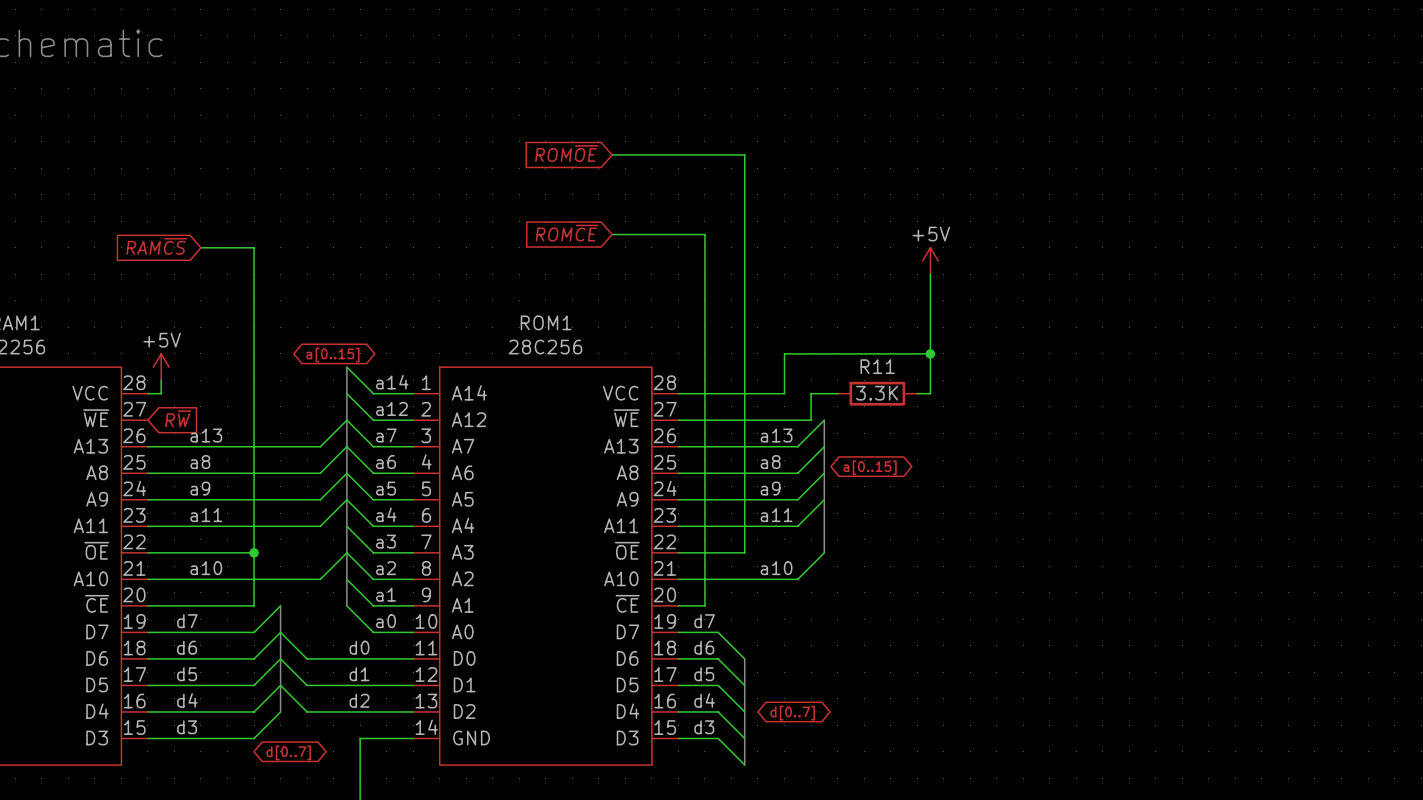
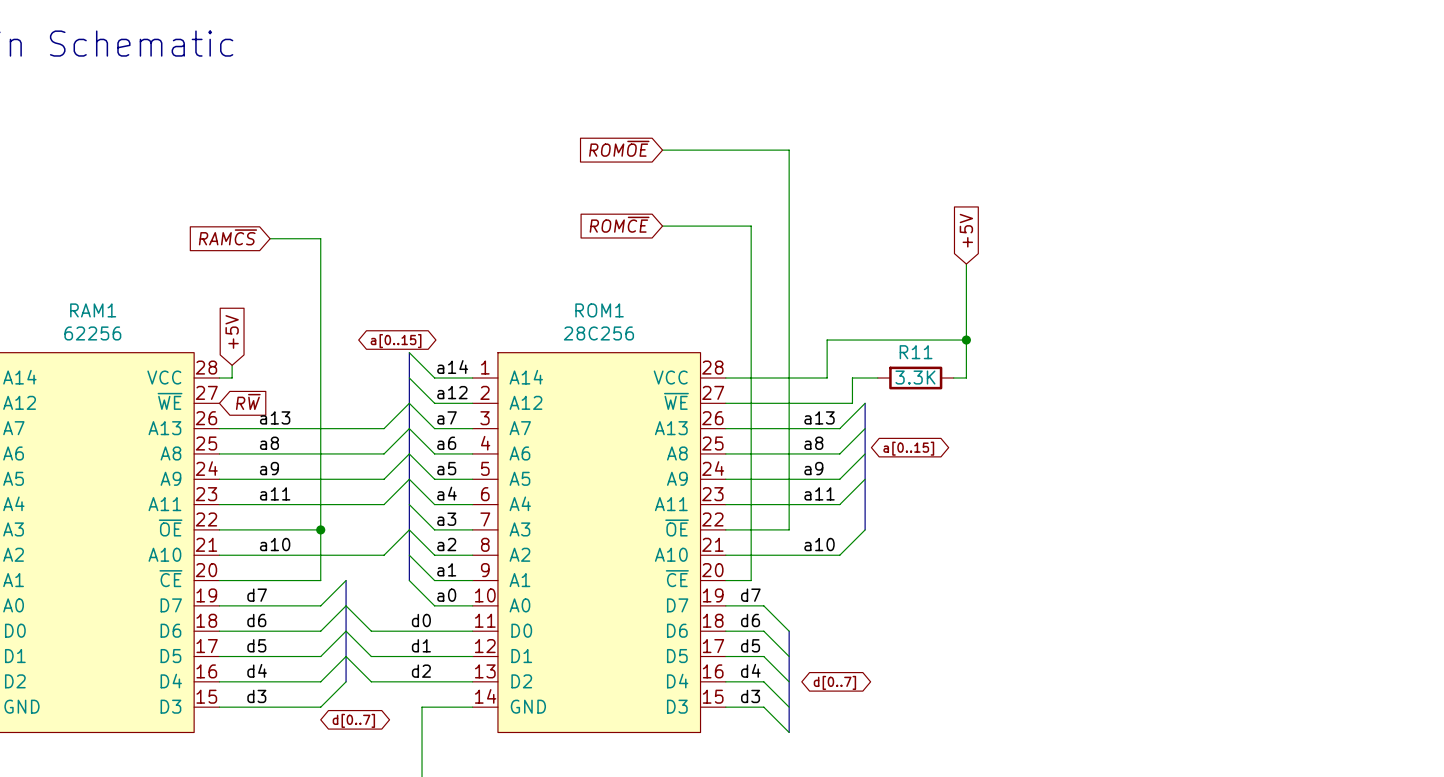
global label: none -> +5V (966, 230)
power symbol: +5V (930, 261) -> none
global label: none -> +5V (232, 331)
power symbol: +5V (161, 367) -> none

